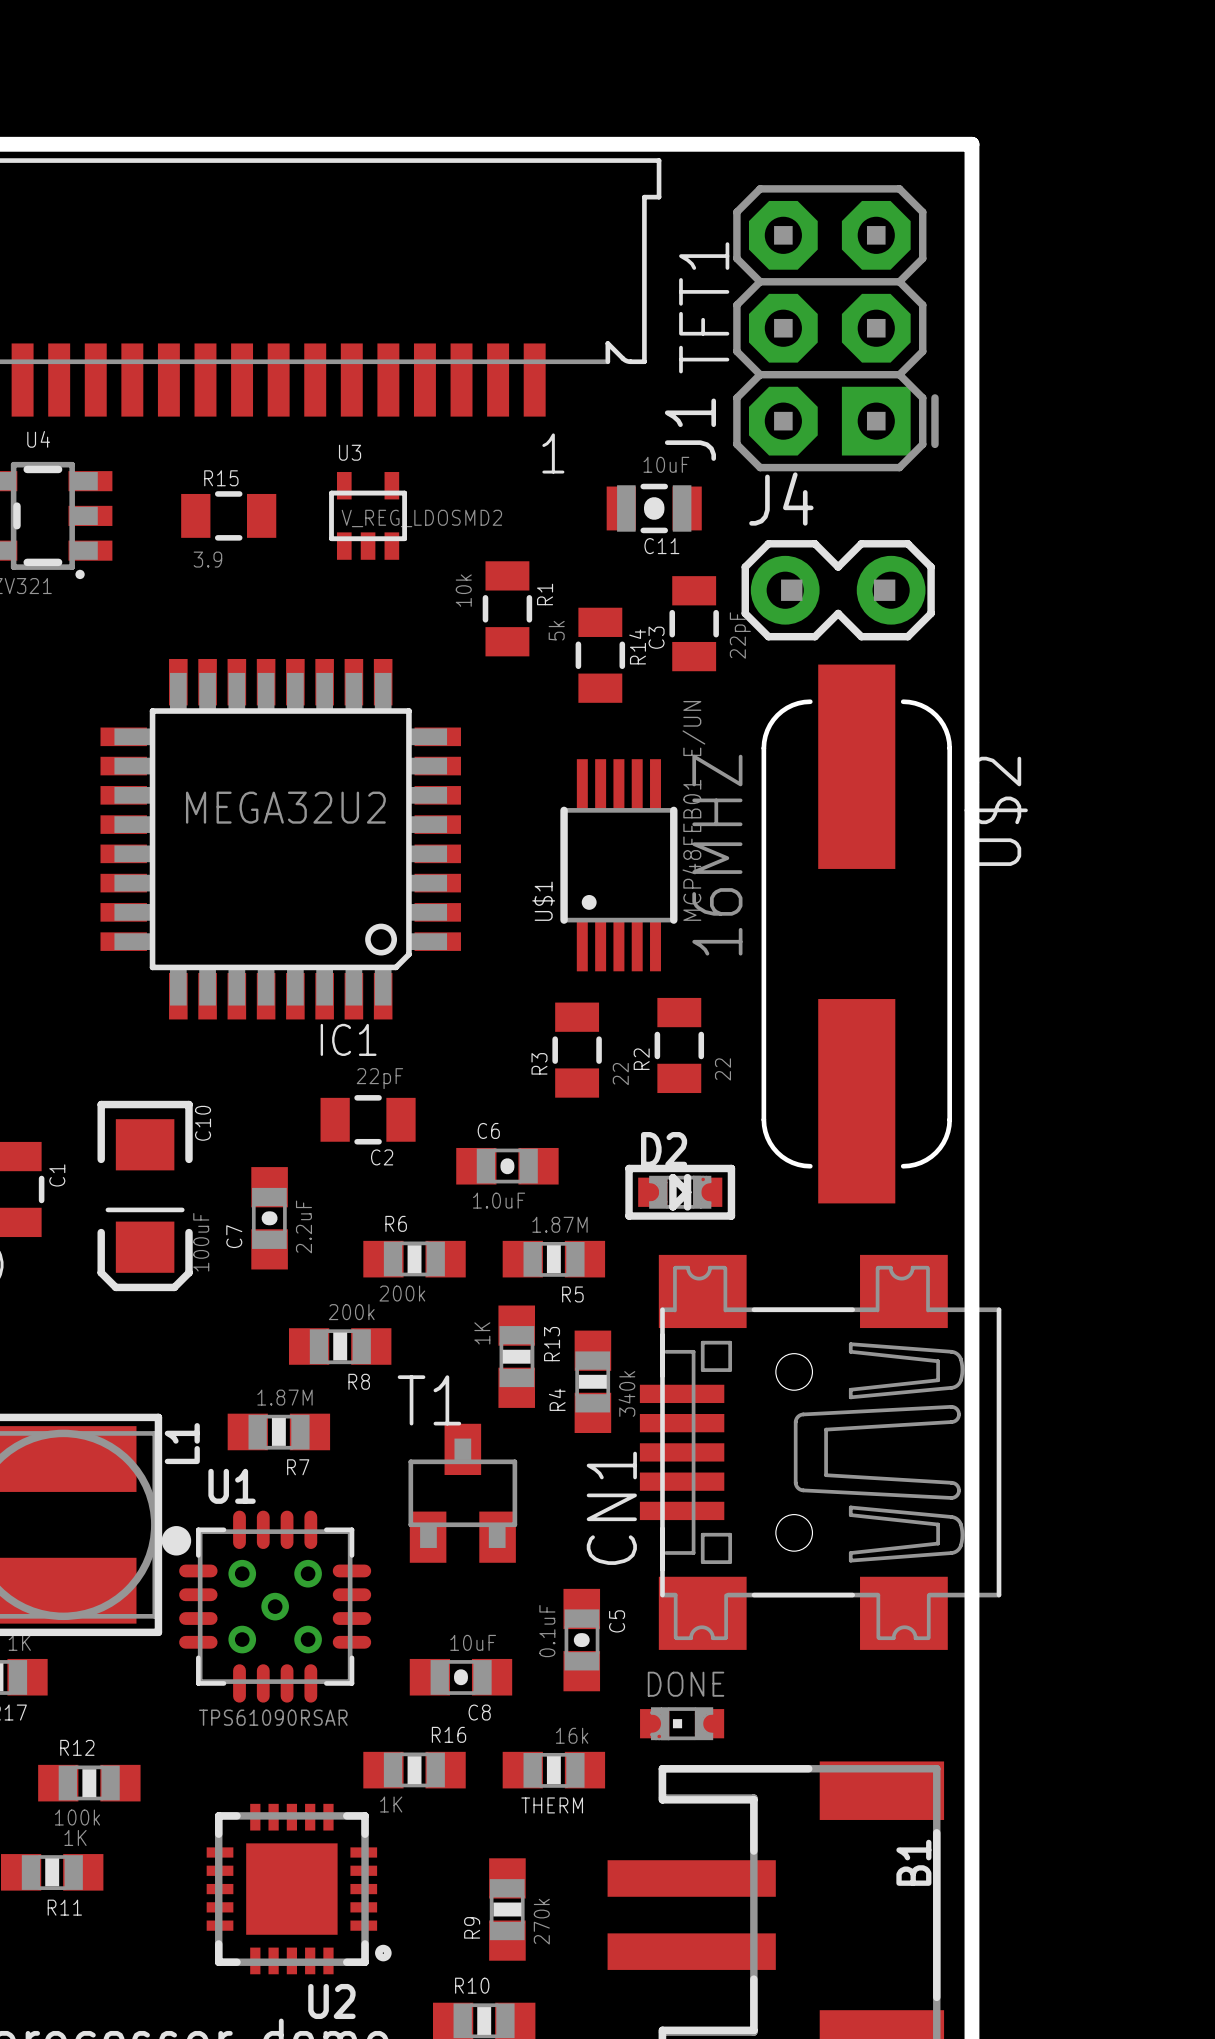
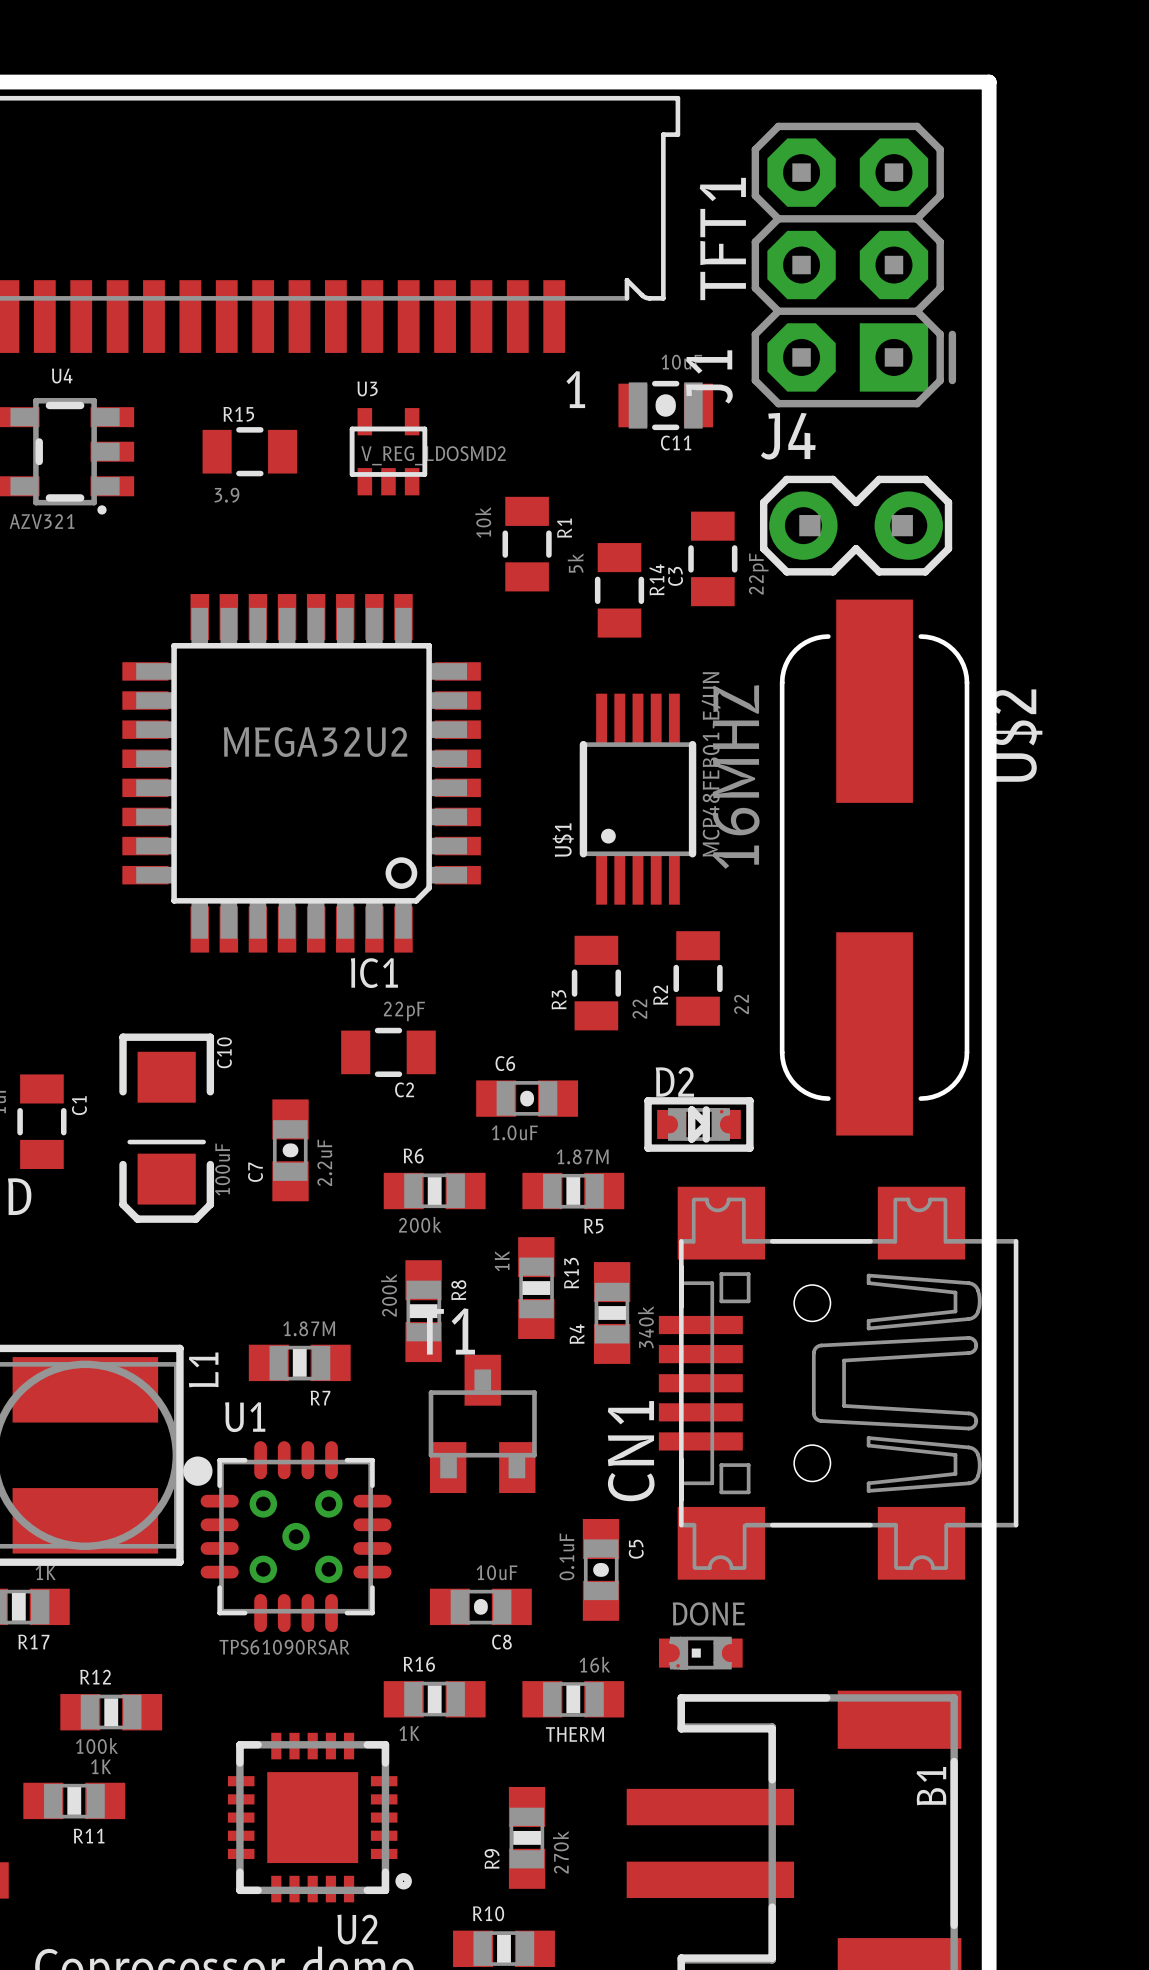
C11 position: (654, 508) -> (665, 405)
R8 rotation: 0° (340, 1346) -> 90° clockwise (423, 1311)
R8 position: (340, 1346) -> (423, 1311)
R16 name position: R16 (448, 1734) -> R16 (419, 1664)

